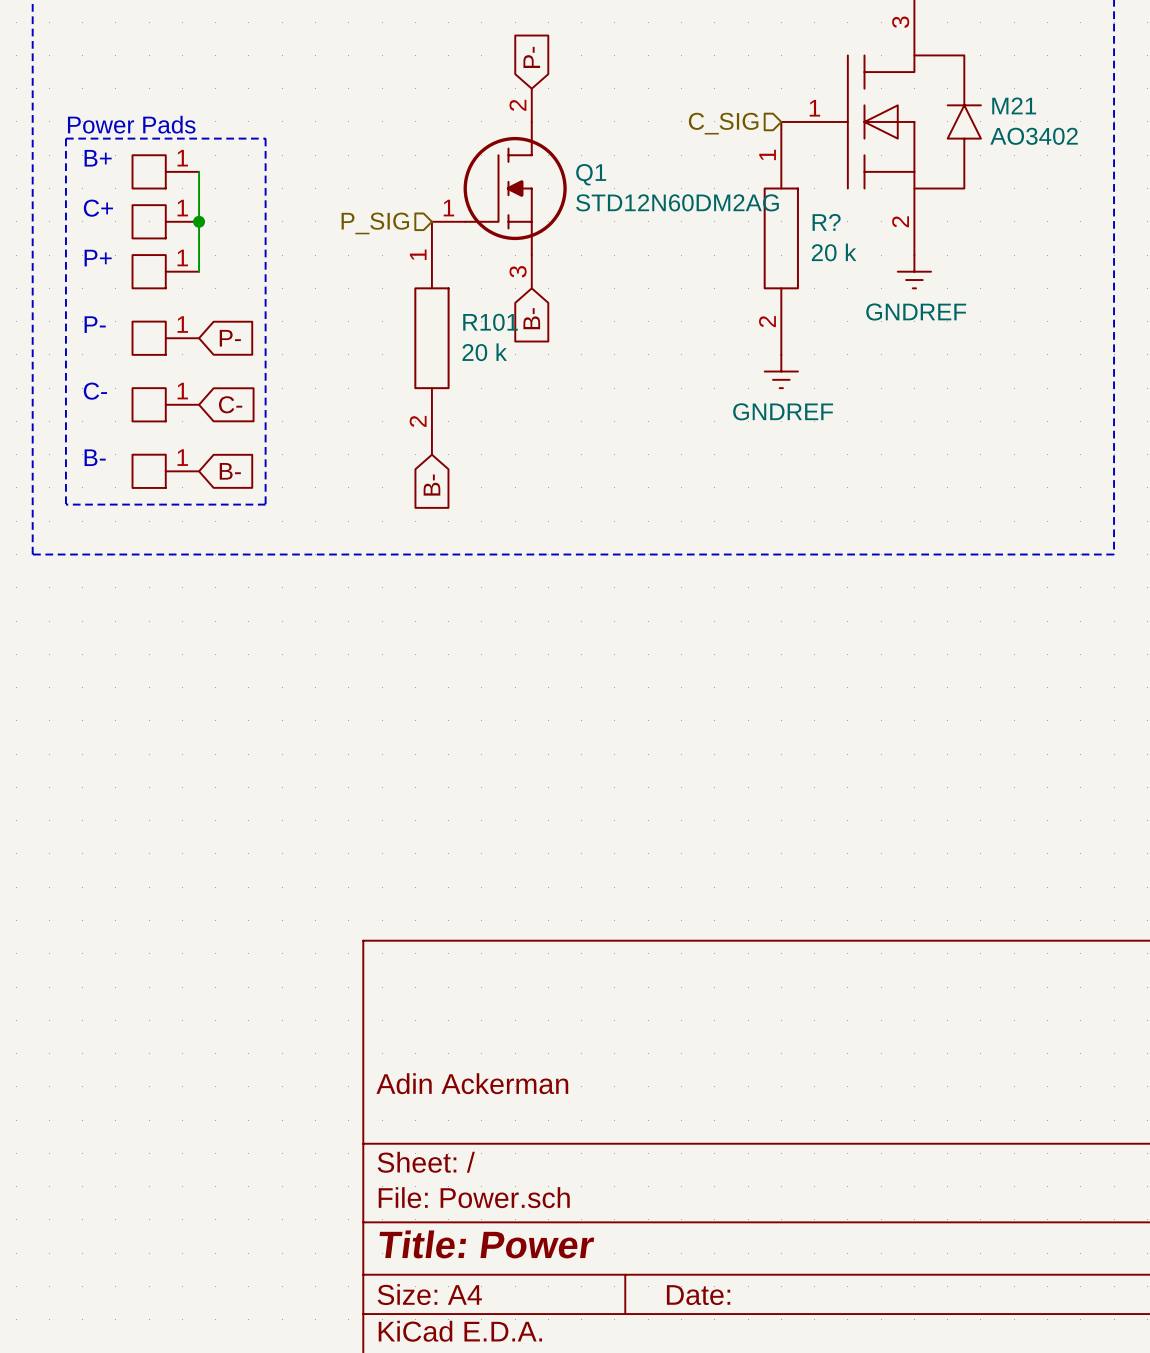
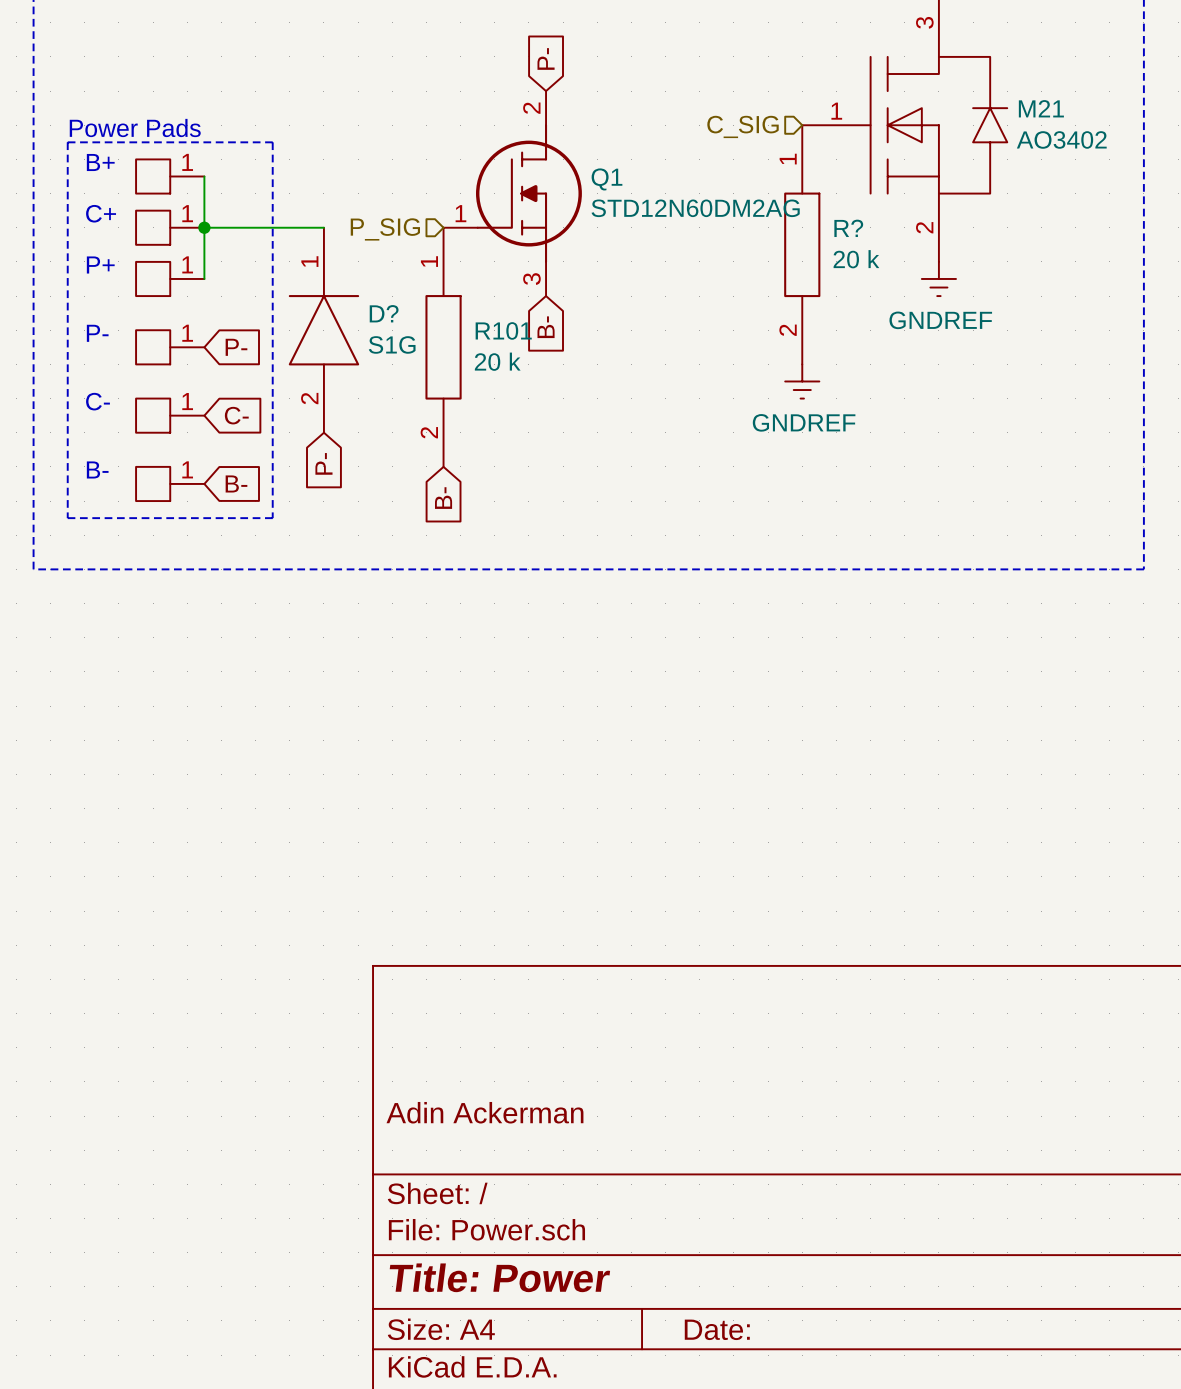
wire: none -> (204, 227) (323, 227)
D?: none -> S1G (323, 330)
global label: none -> P- (323, 463)

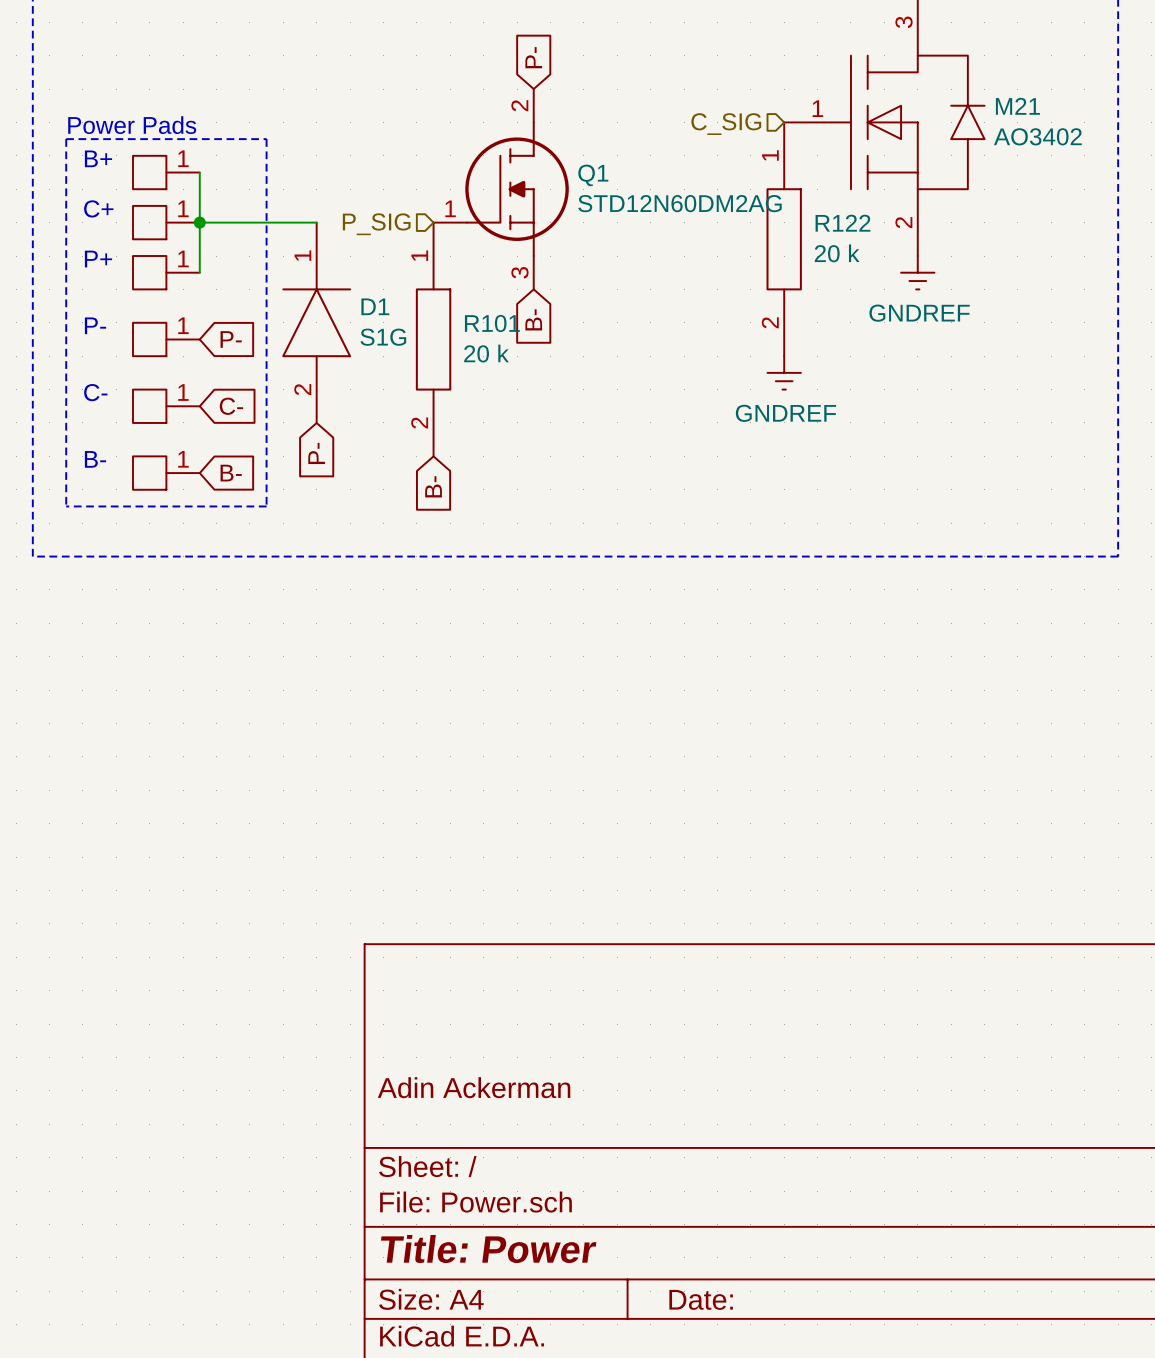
R? name: R? (848, 228) -> R122 (842, 223)
D? name: D? (384, 313) -> D1 (375, 306)

